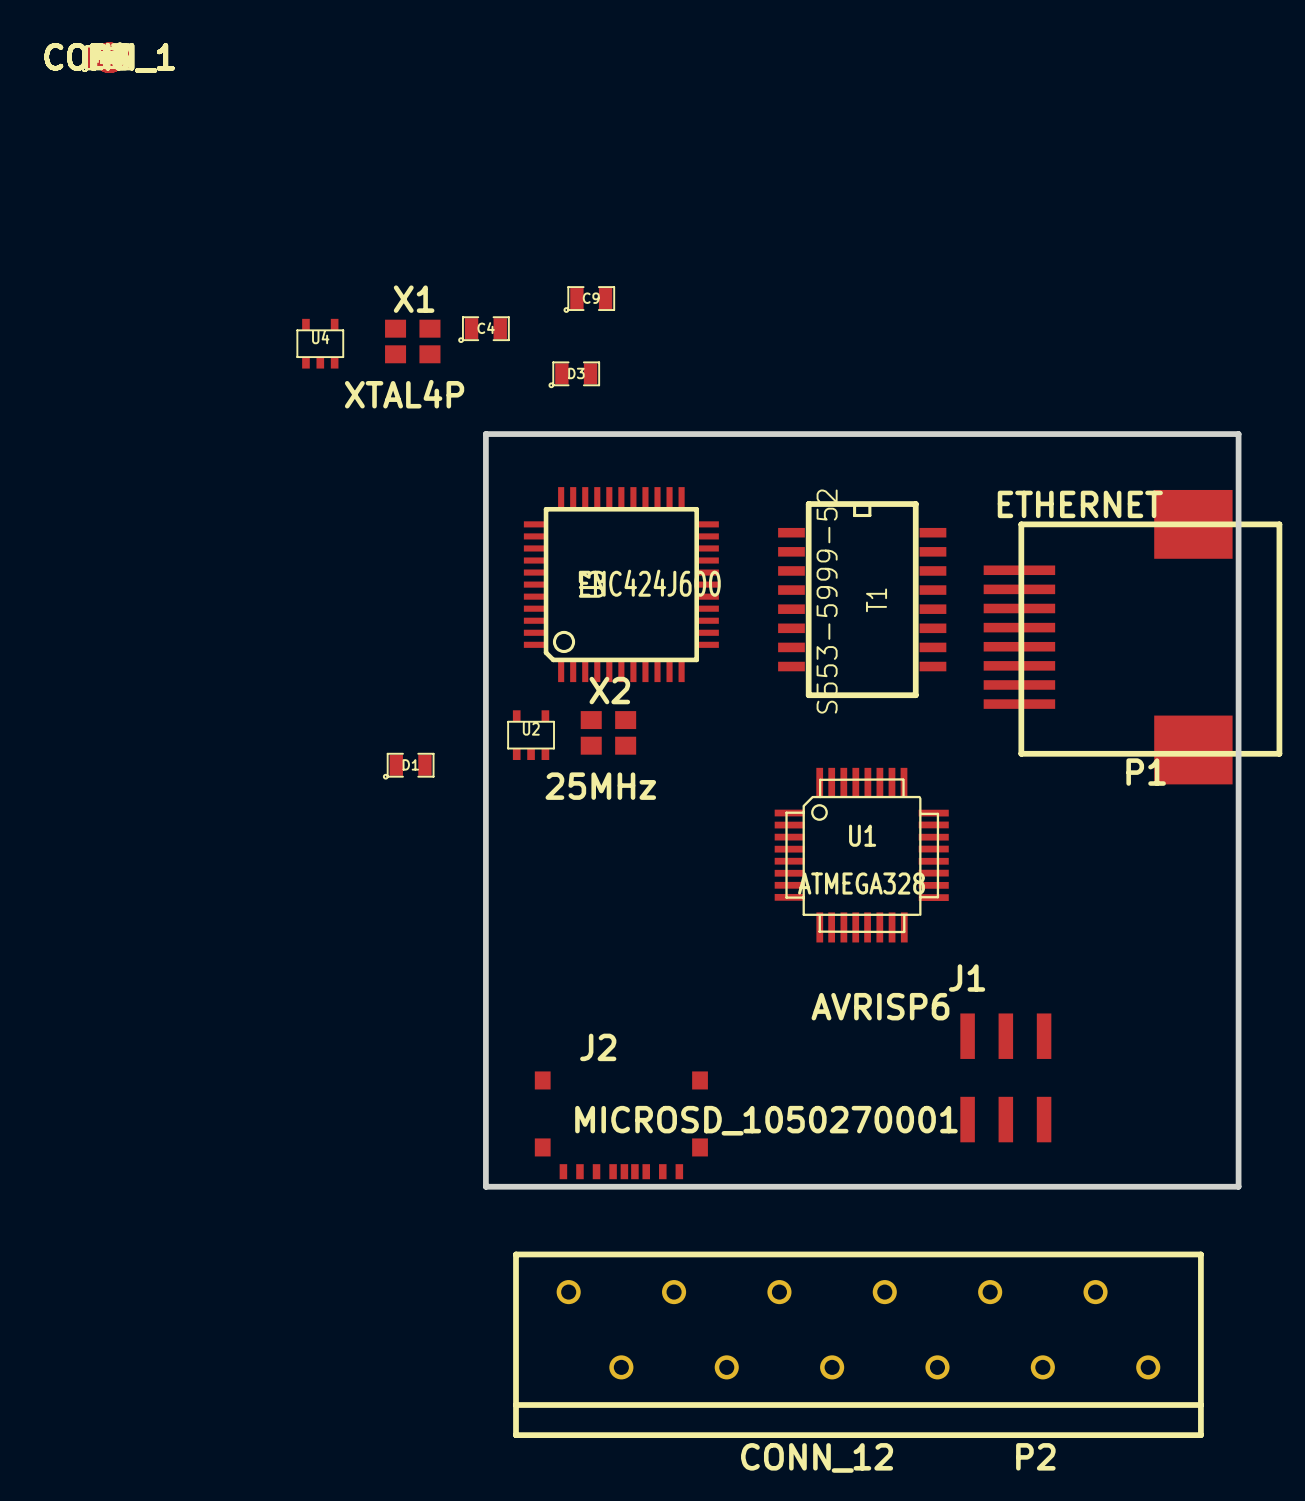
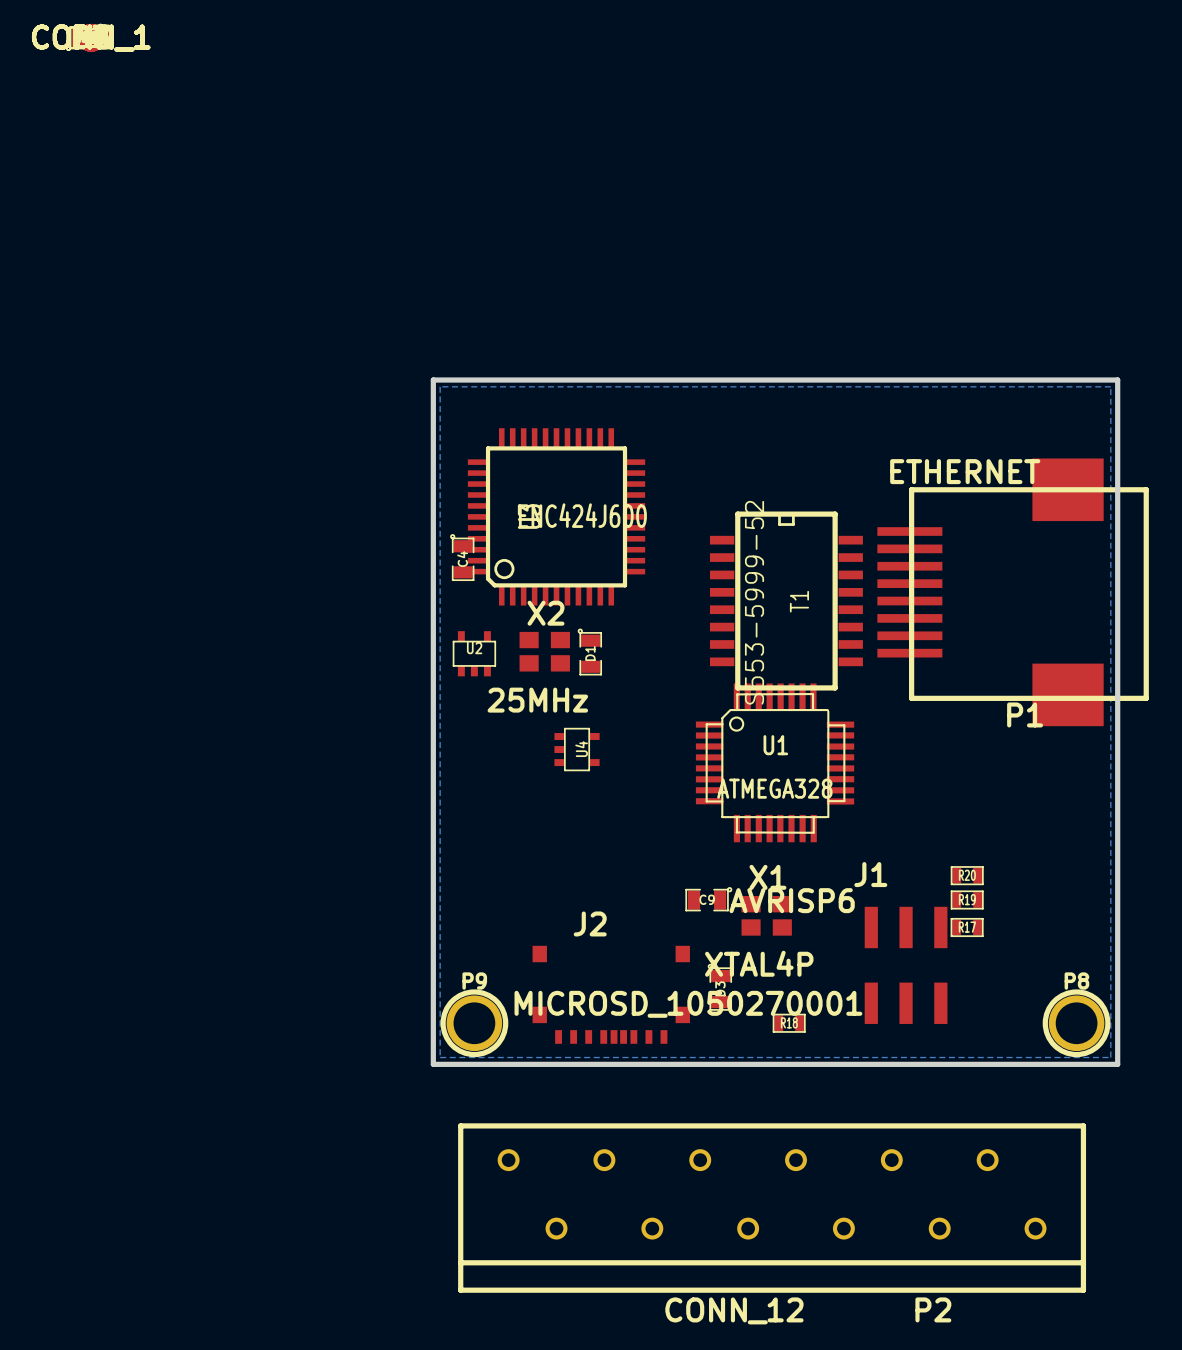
C9 rotation: 0° (589, 299) -> 180° (708, 899)
C9 position: (589, 299) -> (708, 899)
C4 rotation: 0° (483, 329) -> 90° clockwise (462, 557)
C4 position: (483, 329) -> (462, 557)
X1 position: (412, 341) -> (766, 915)
U4 rotation: 0° (320, 343) -> 90° clockwise (577, 749)
U4 position: (320, 343) -> (577, 749)
D3 rotation: 0° (574, 374) -> 90° clockwise (719, 987)
D3 position: (574, 374) -> (719, 987)
bottom zone outline: none -> (440, 386) (1110, 386) (1110, 1057) (440, 1057) (440, 386)
T1 position: (862, 599) -> (786, 601)
P1 position: (1132, 637) -> (1013, 592)
D1 rotation: 0° (408, 766) -> 90° clockwise (589, 652)
D1 position: (408, 766) -> (589, 652)
R20: none -> (967, 875)
R19: none -> (967, 899)
R17: none -> (967, 927)
J2 position: (621, 1125) -> (611, 994)
P9: none -> (474, 1023)
R18: none -> (789, 1023)
P8: none -> (1076, 1023)

